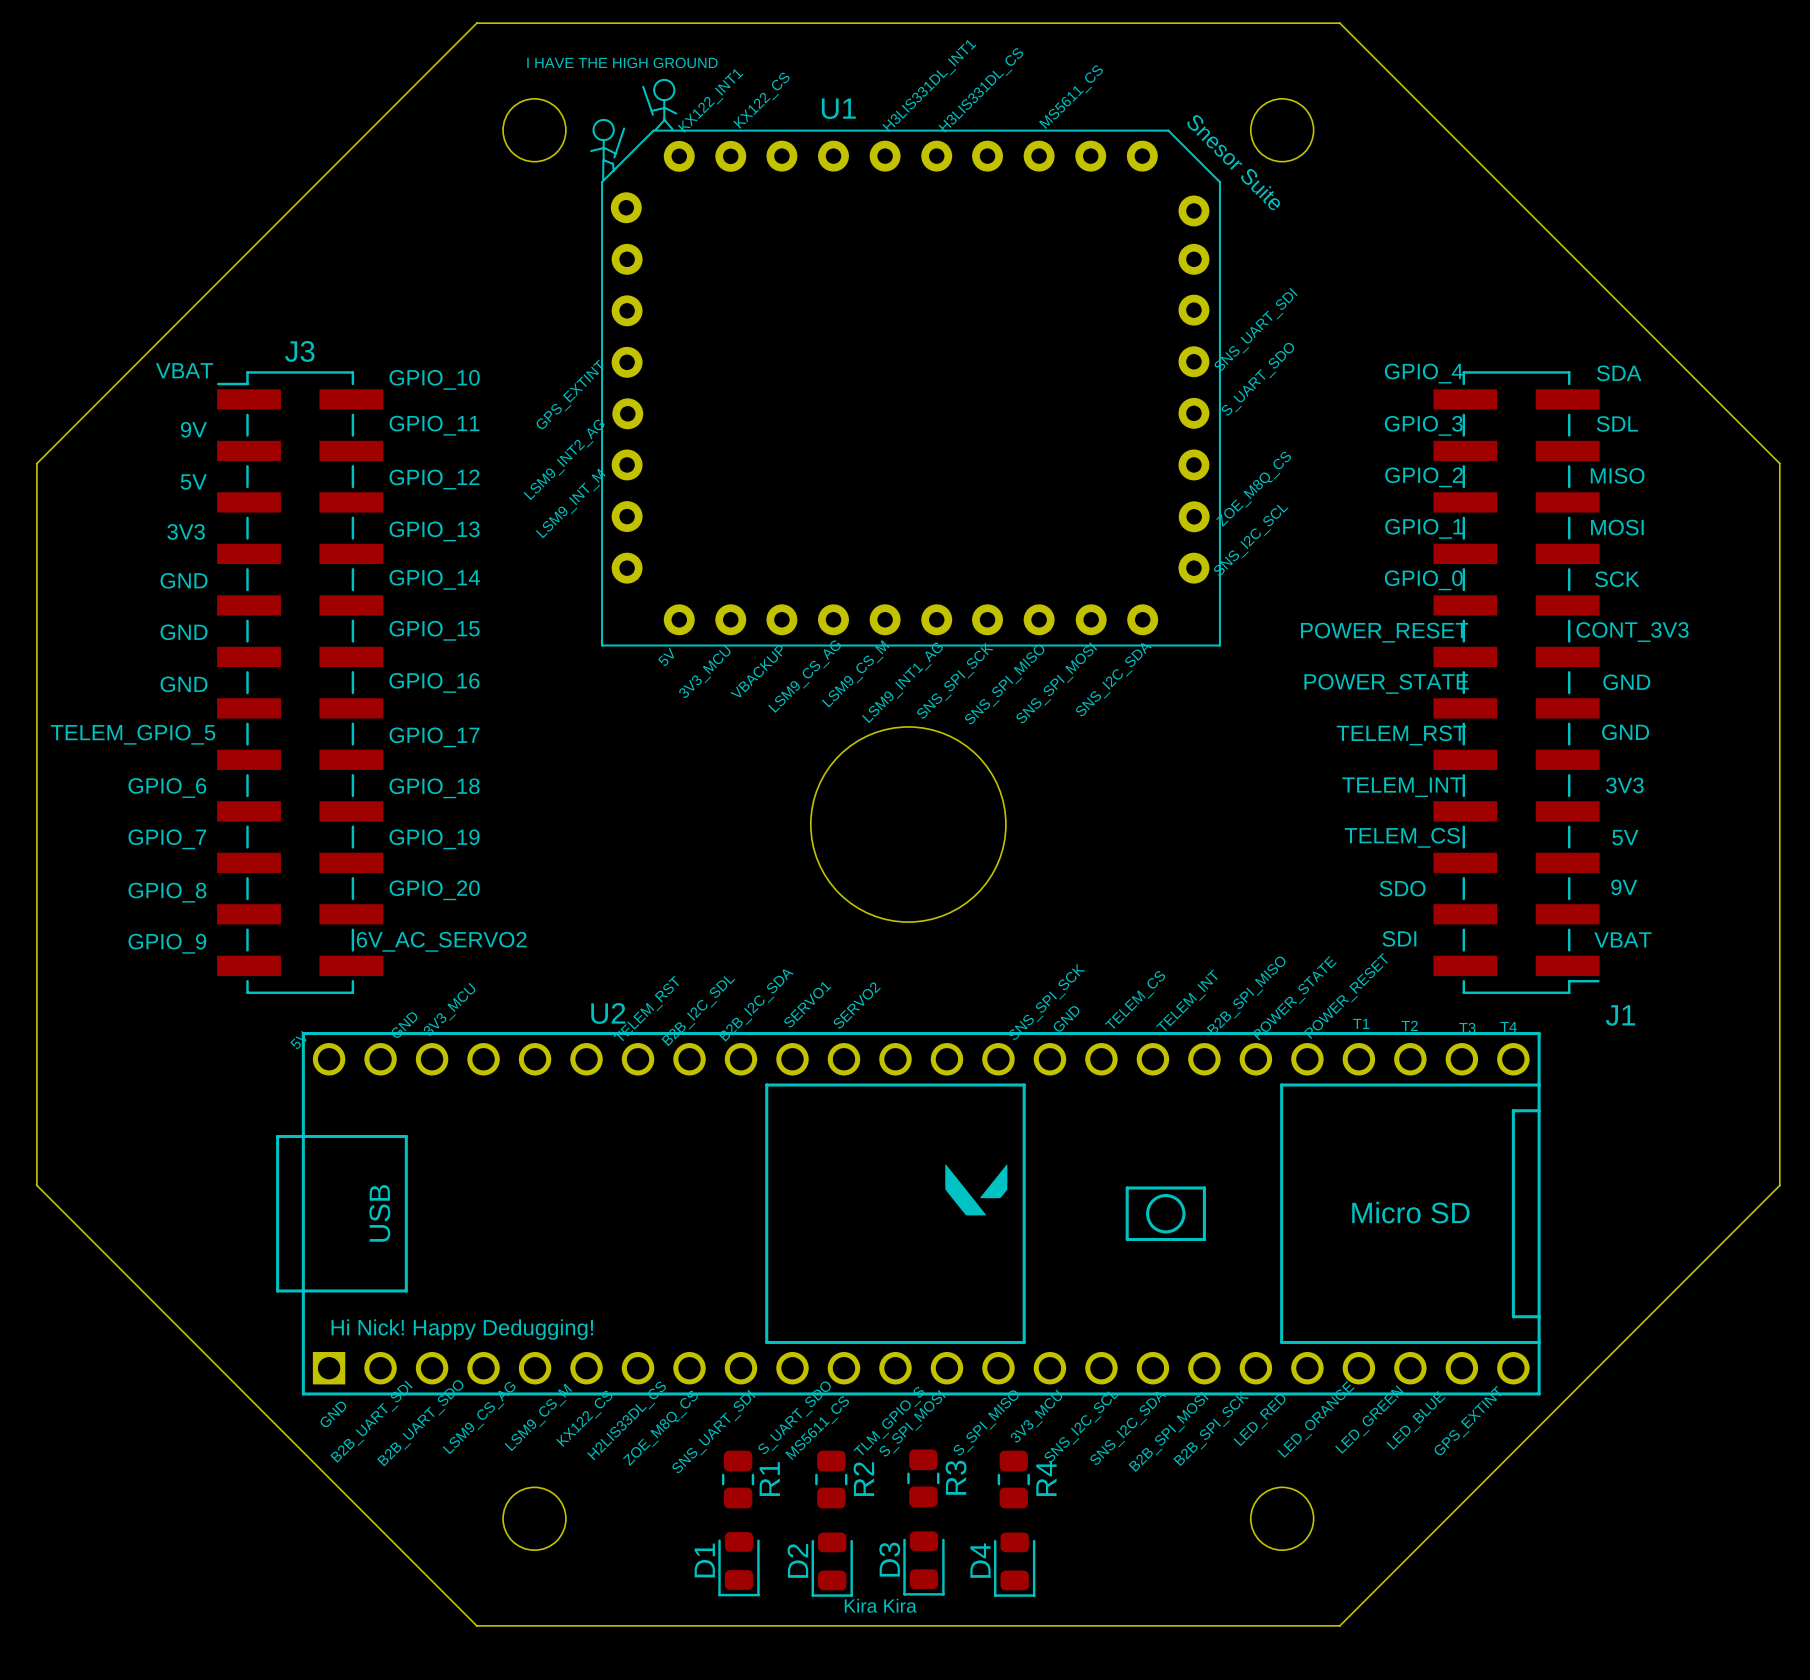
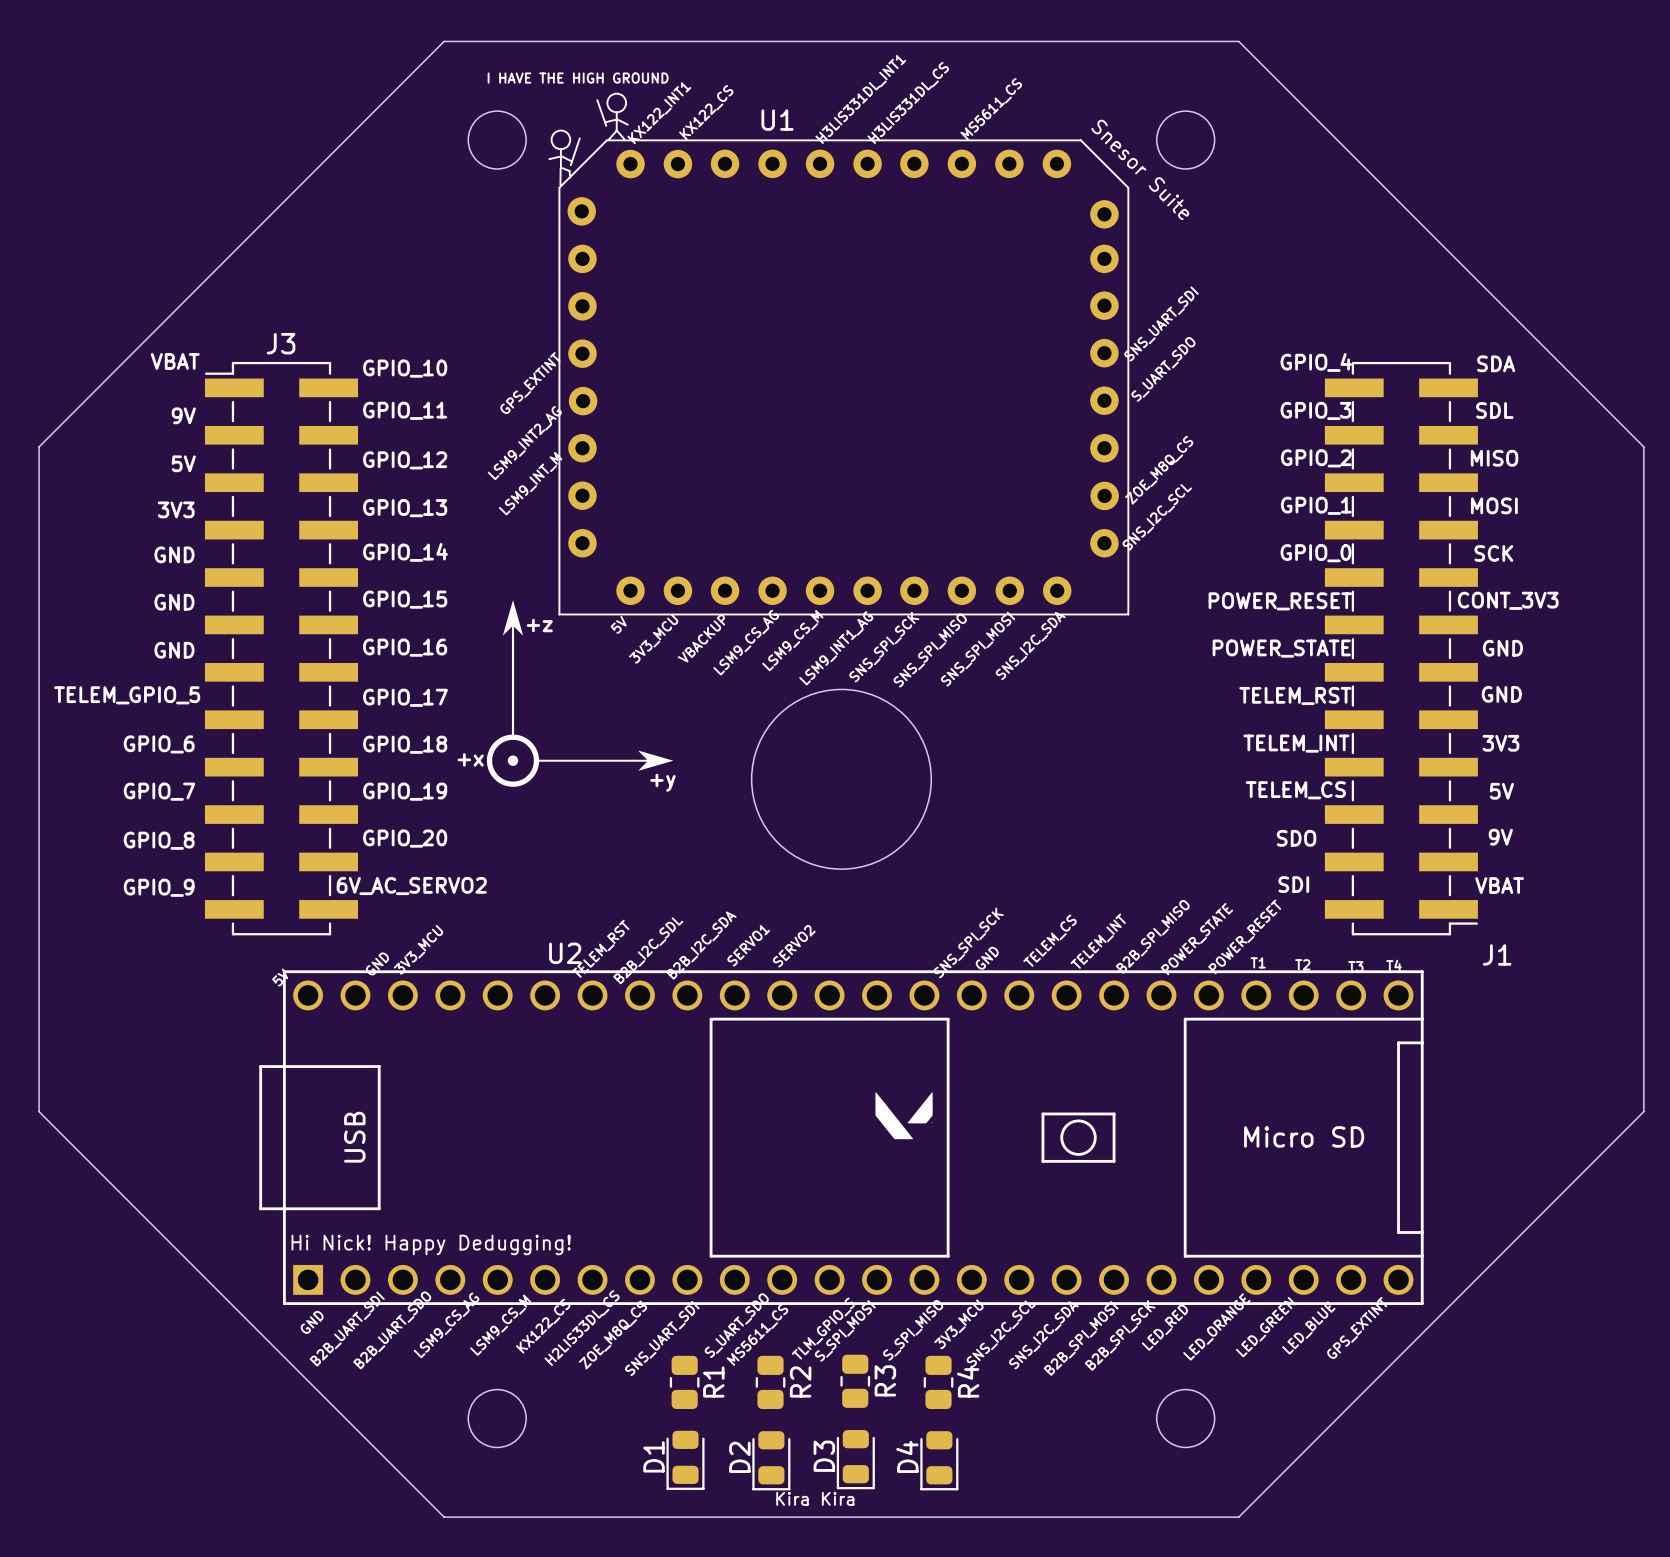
drawing: none -> [486, 600, 674, 787]
text: none -> +z (539, 625)
text: none -> +x (470, 759)
text: none -> +y (662, 782)

